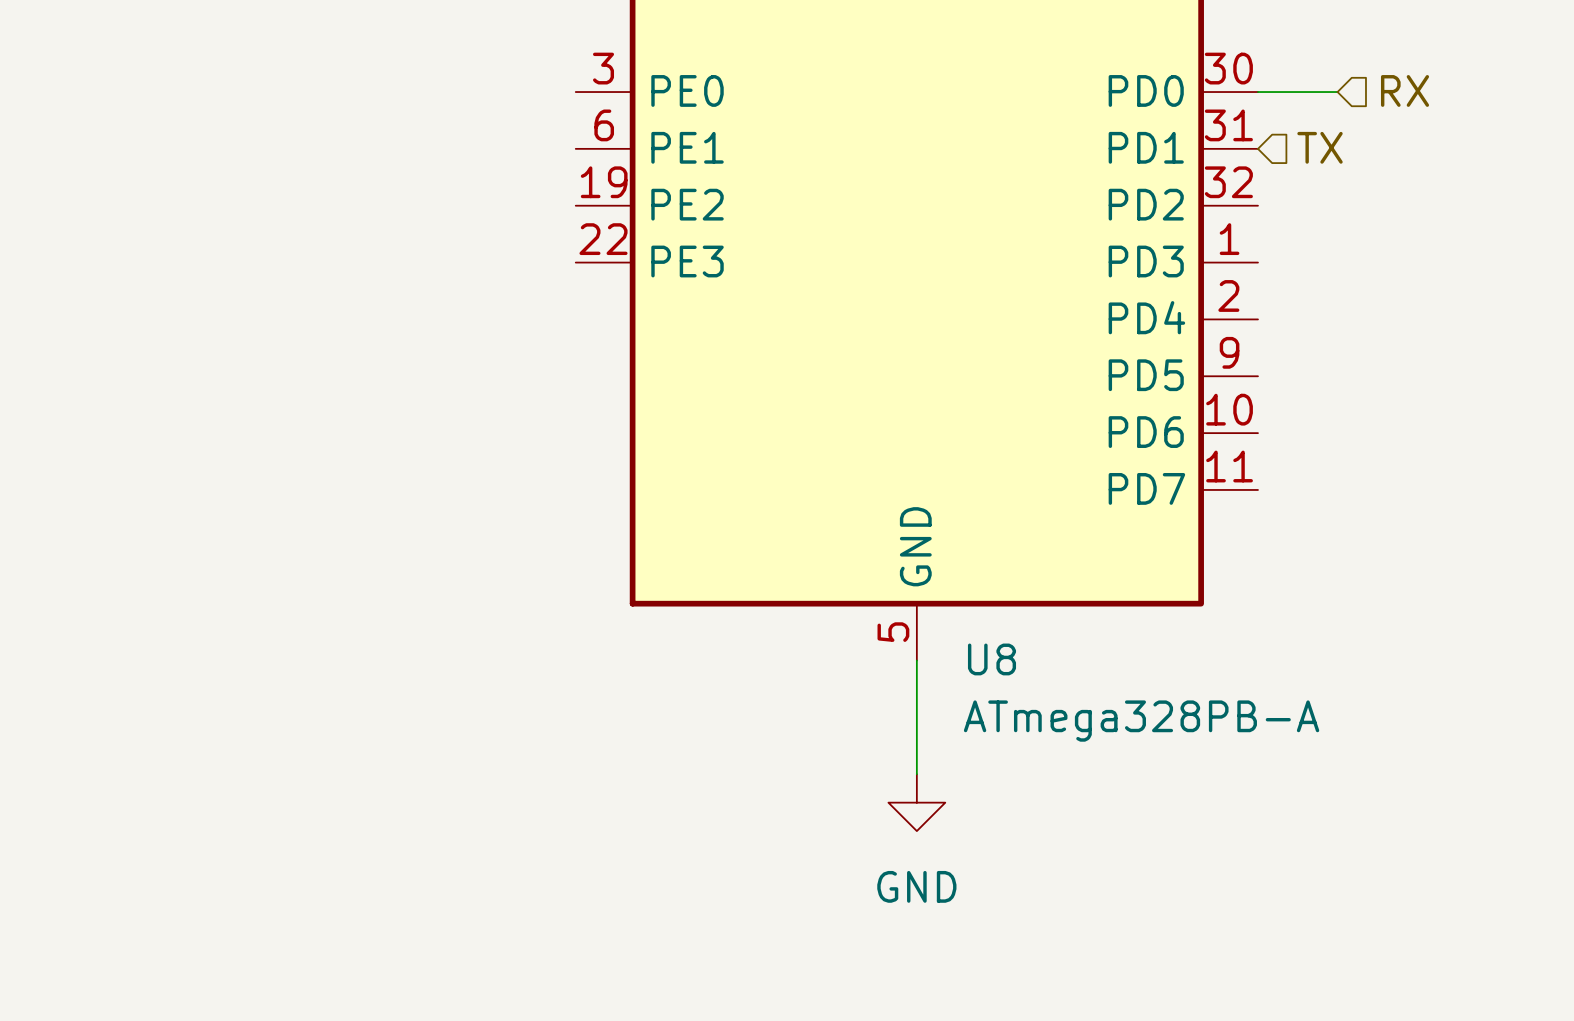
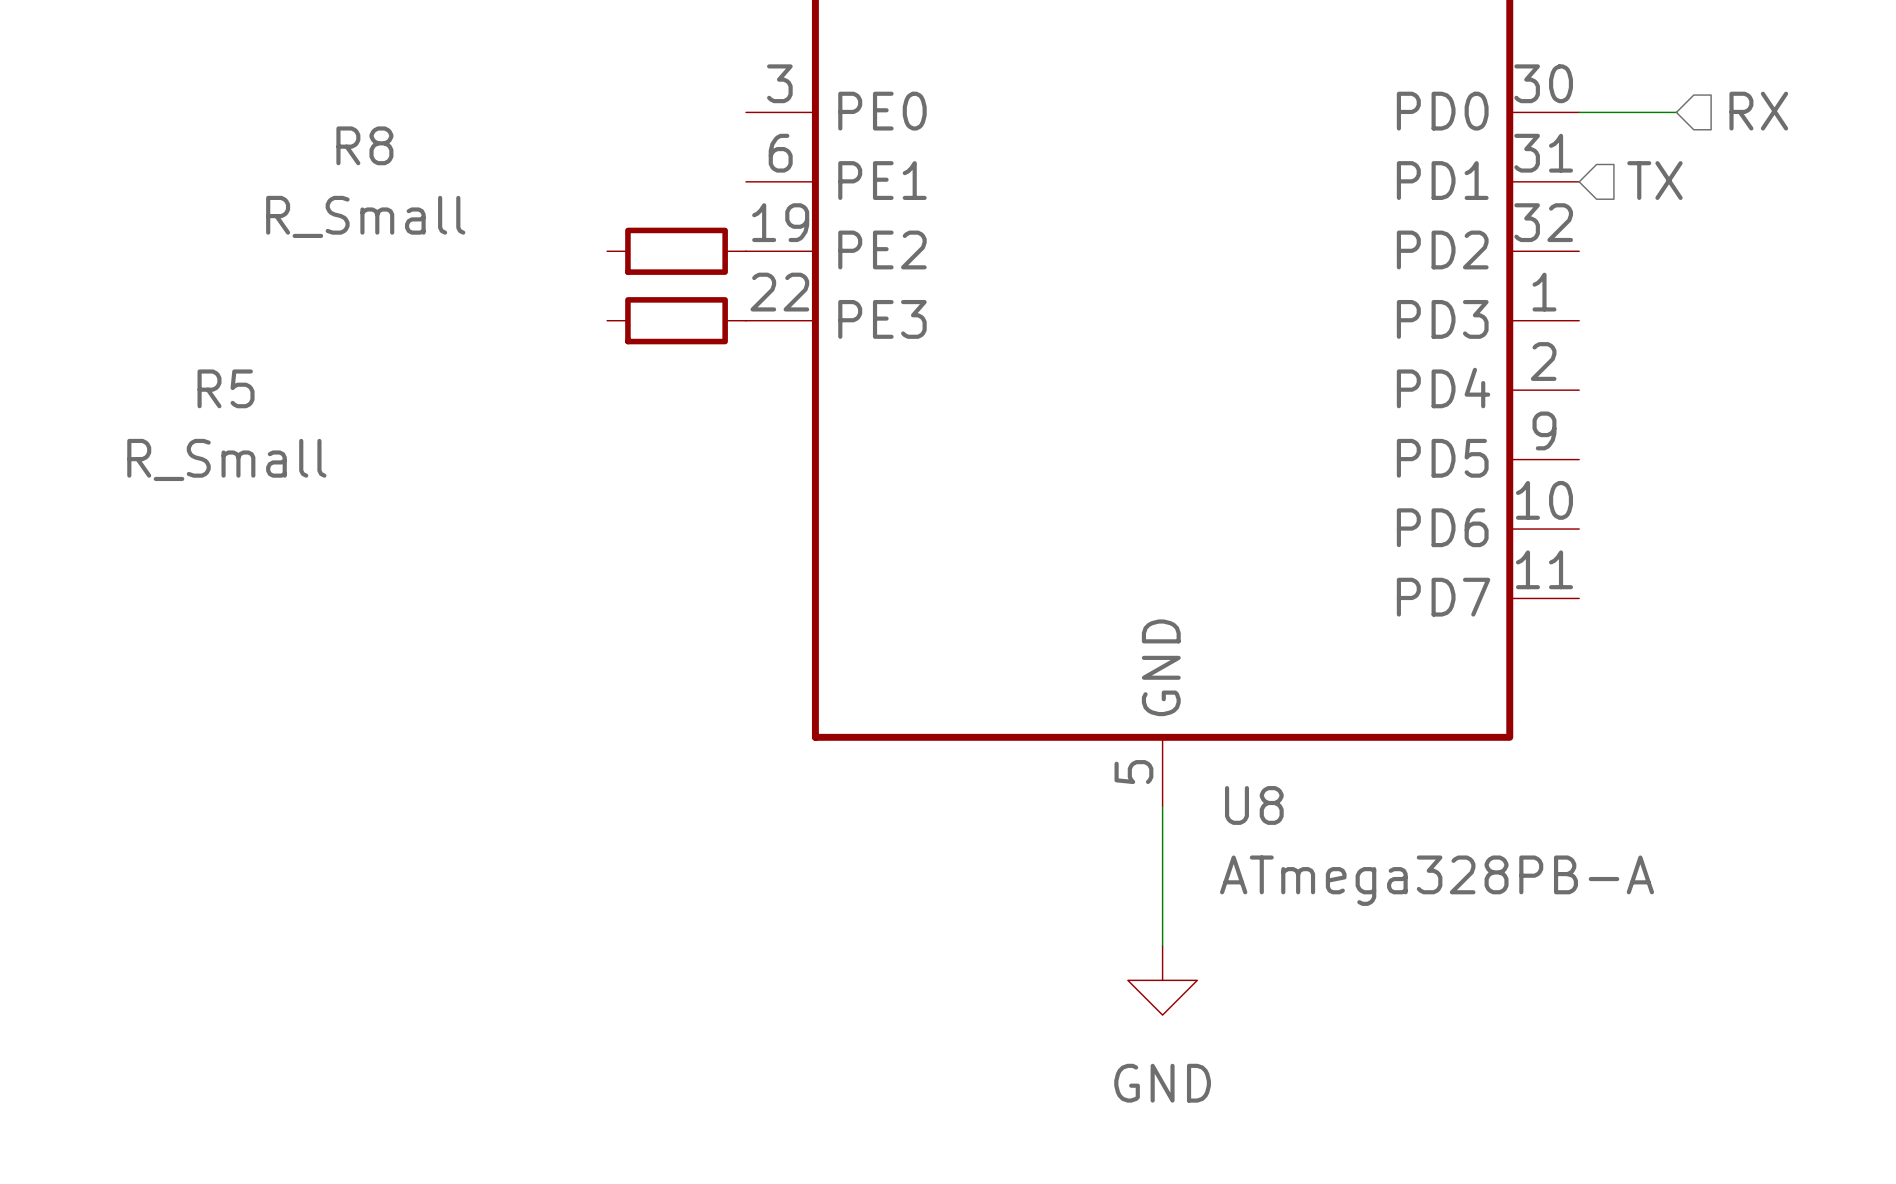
R8: none -> R_Small (676, 251)
R5: none -> R_Small (676, 320)

